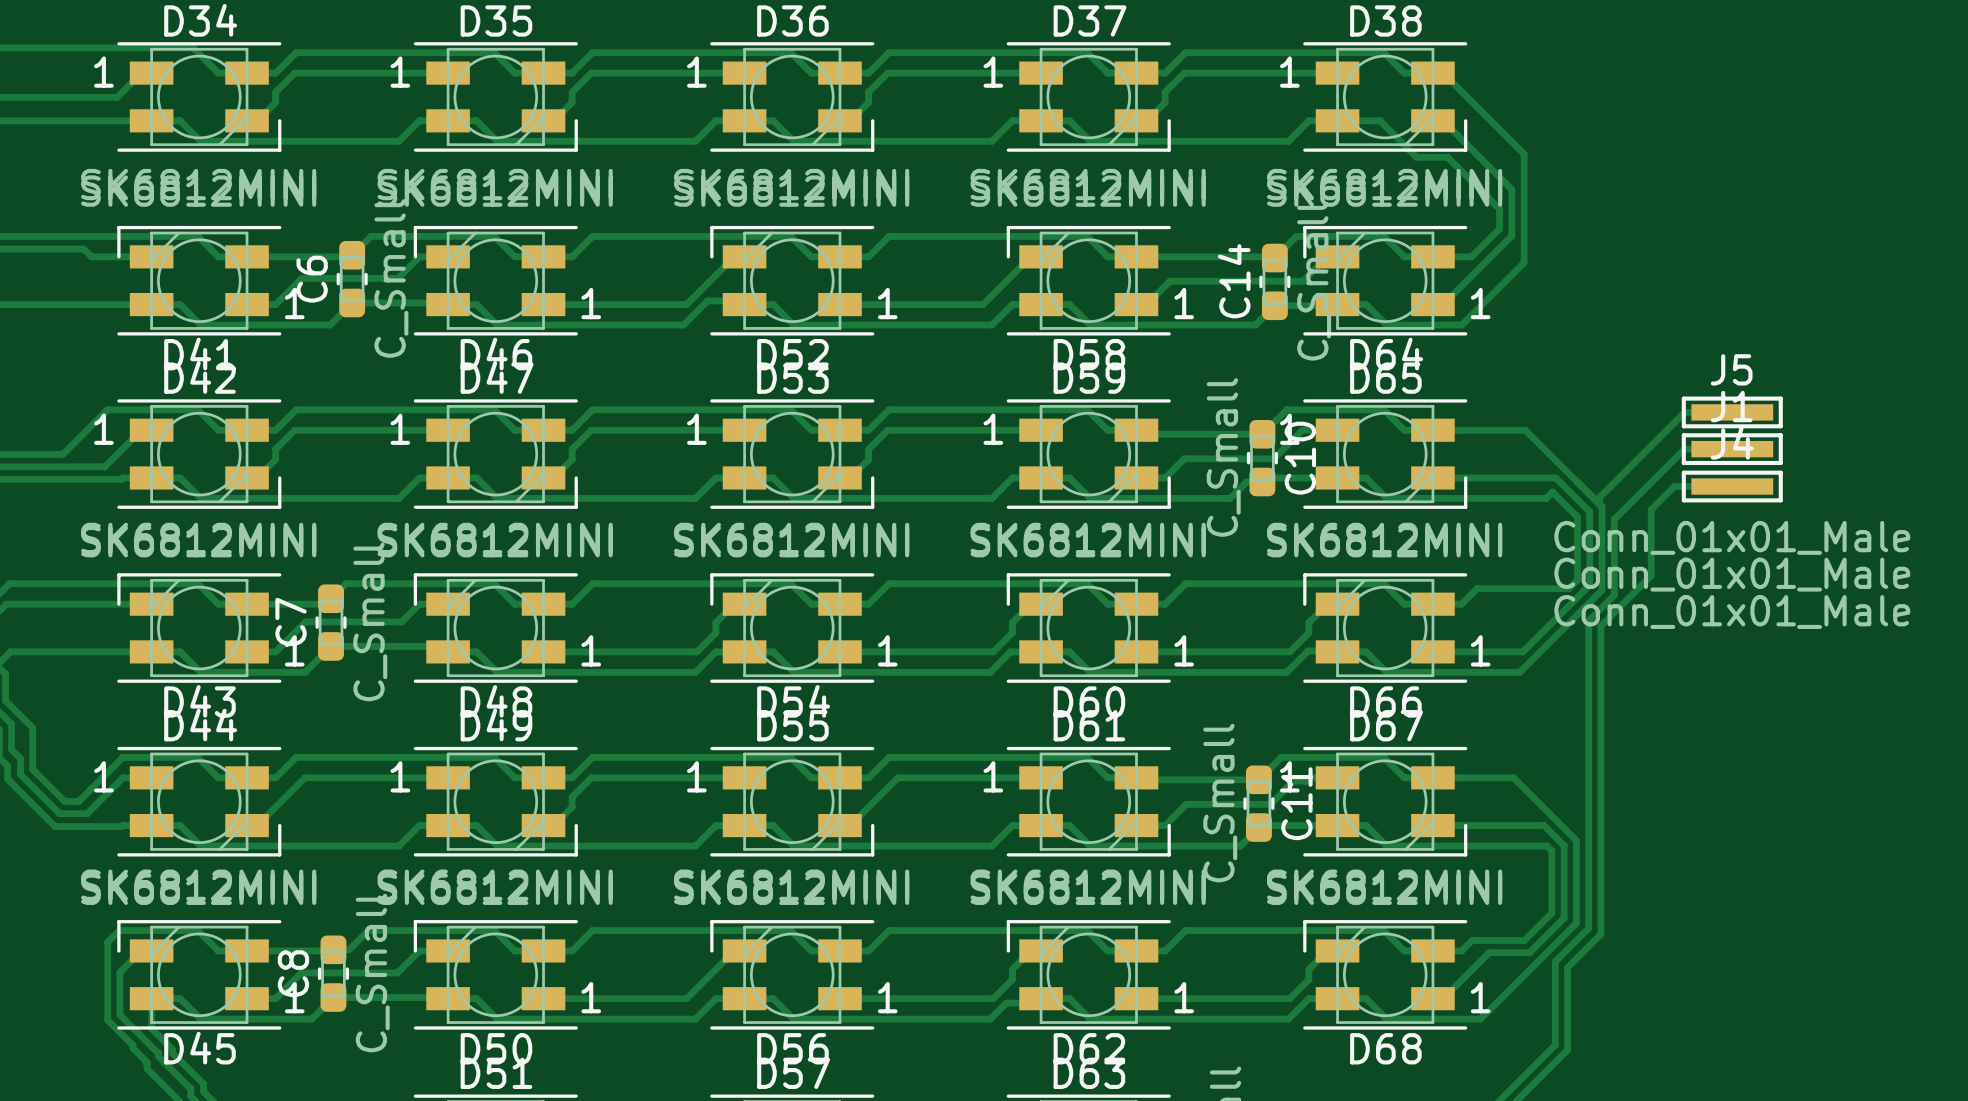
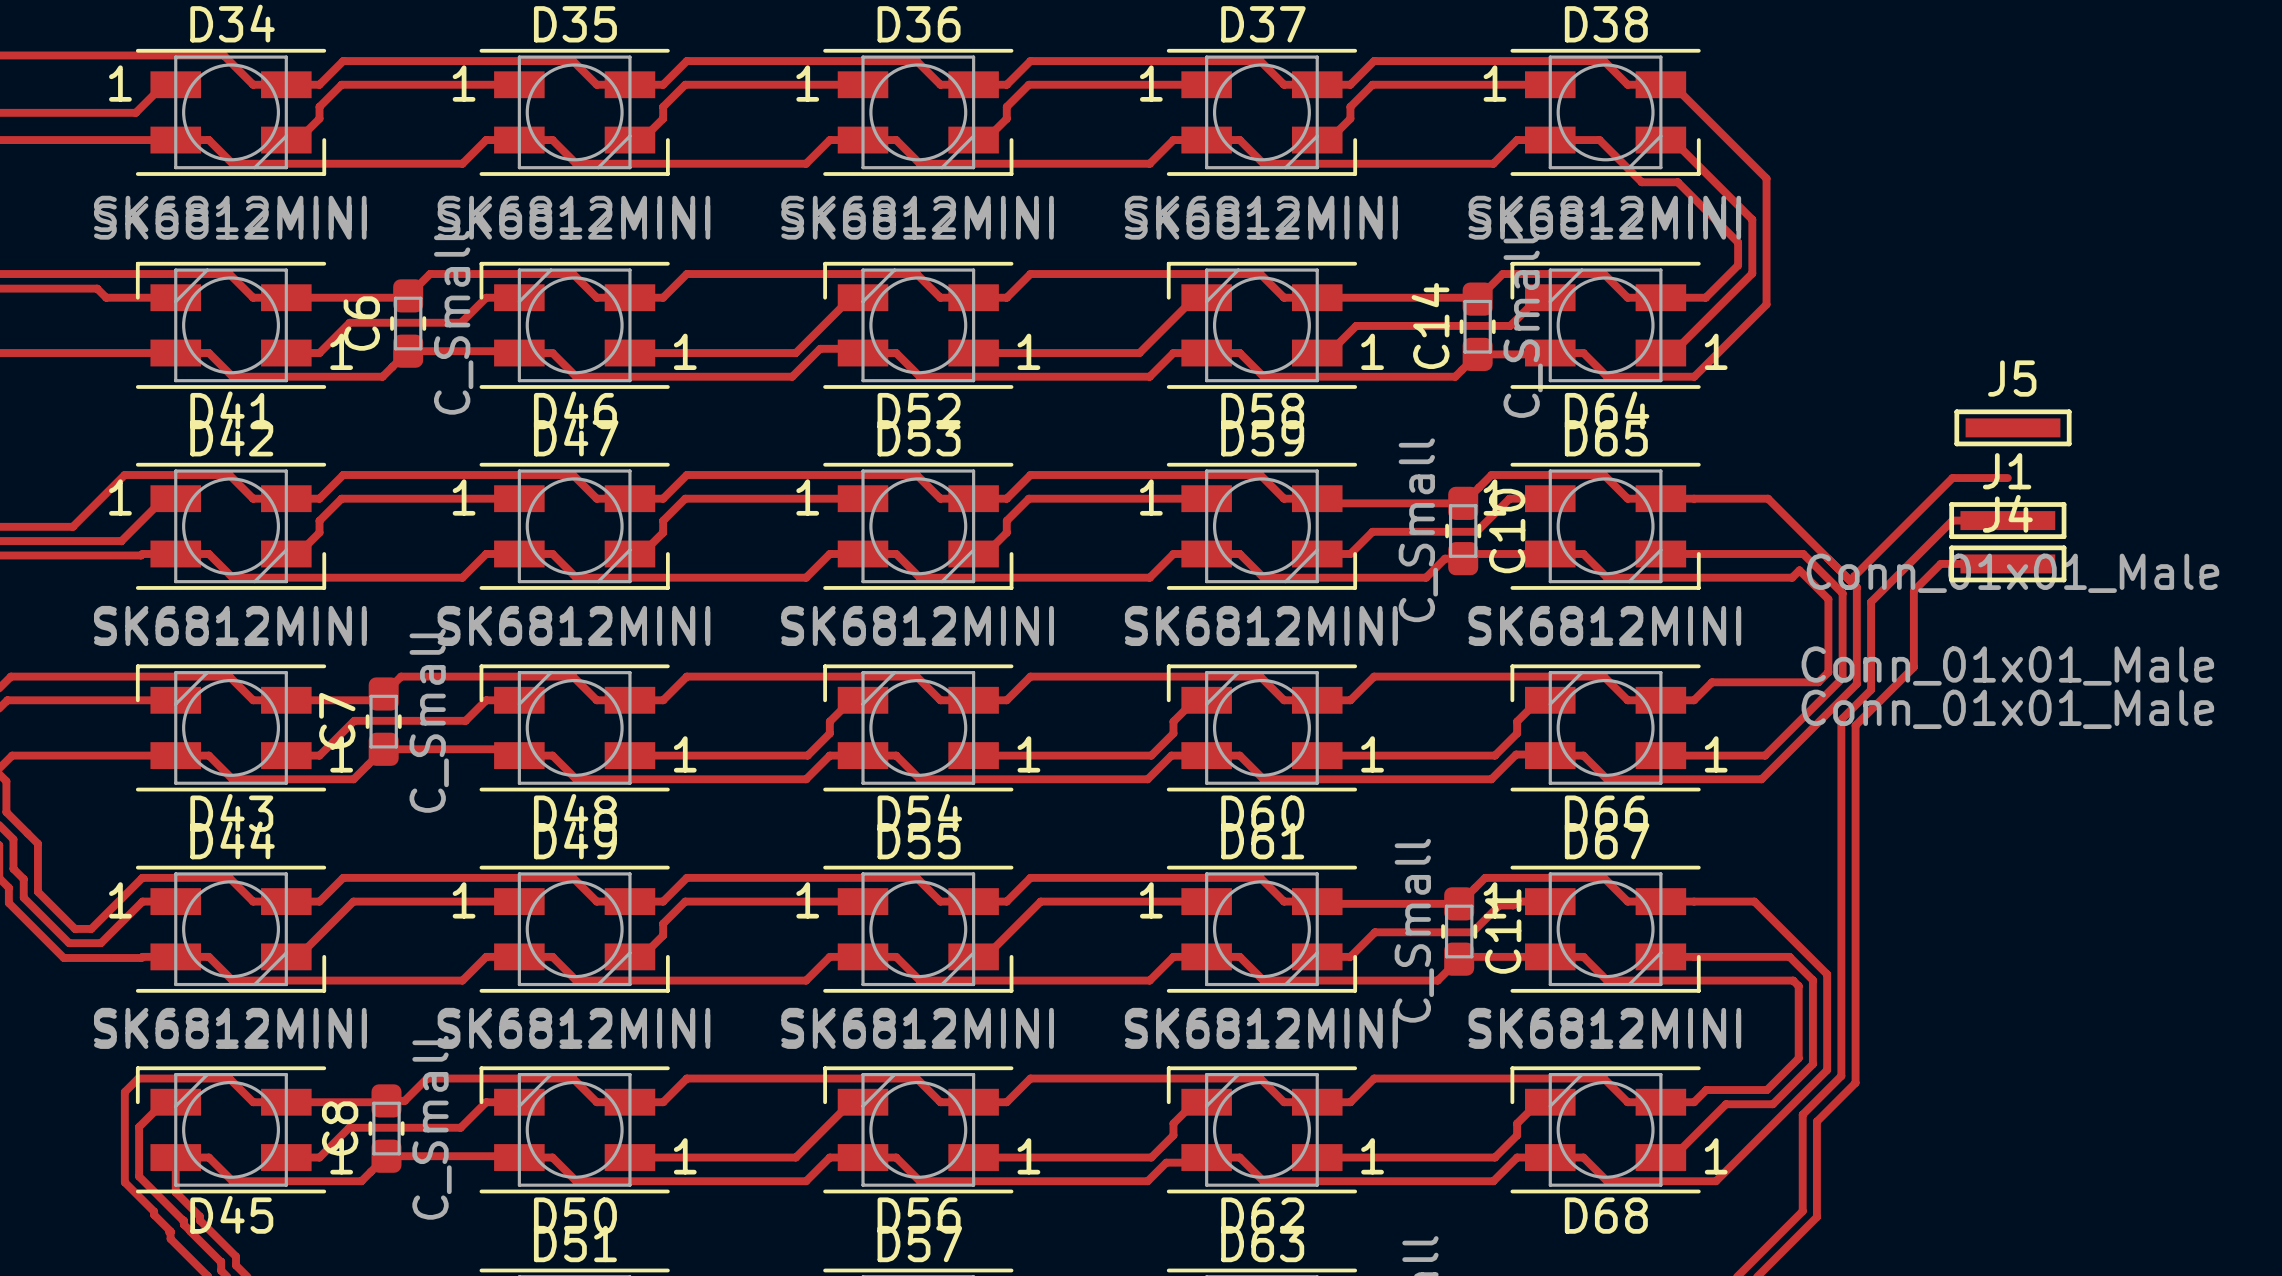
J5 position: (1732, 412) -> (2012, 427)

